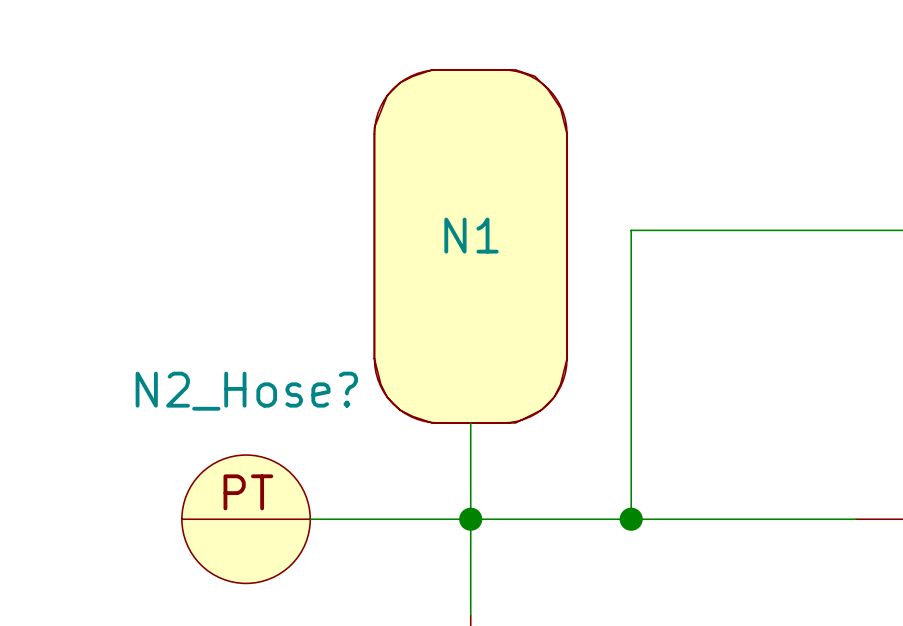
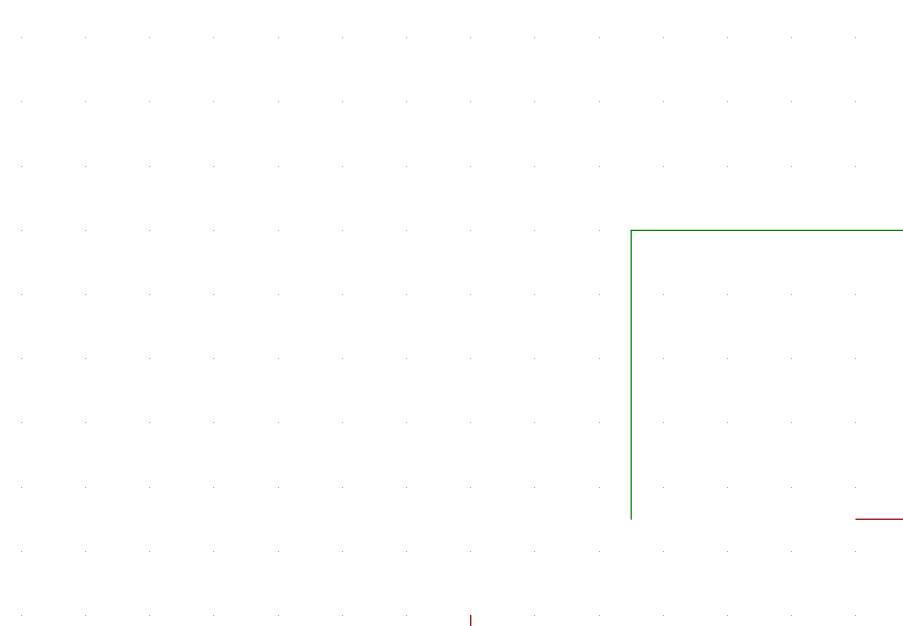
N1: (470, 246) -> none
wire: (470, 422) (470, 615) -> none
N2_Hose?: (246, 519) -> none
wire: (310, 519) (855, 519) -> none
junction: (470, 519) -> none
junction: (631, 519) -> none

